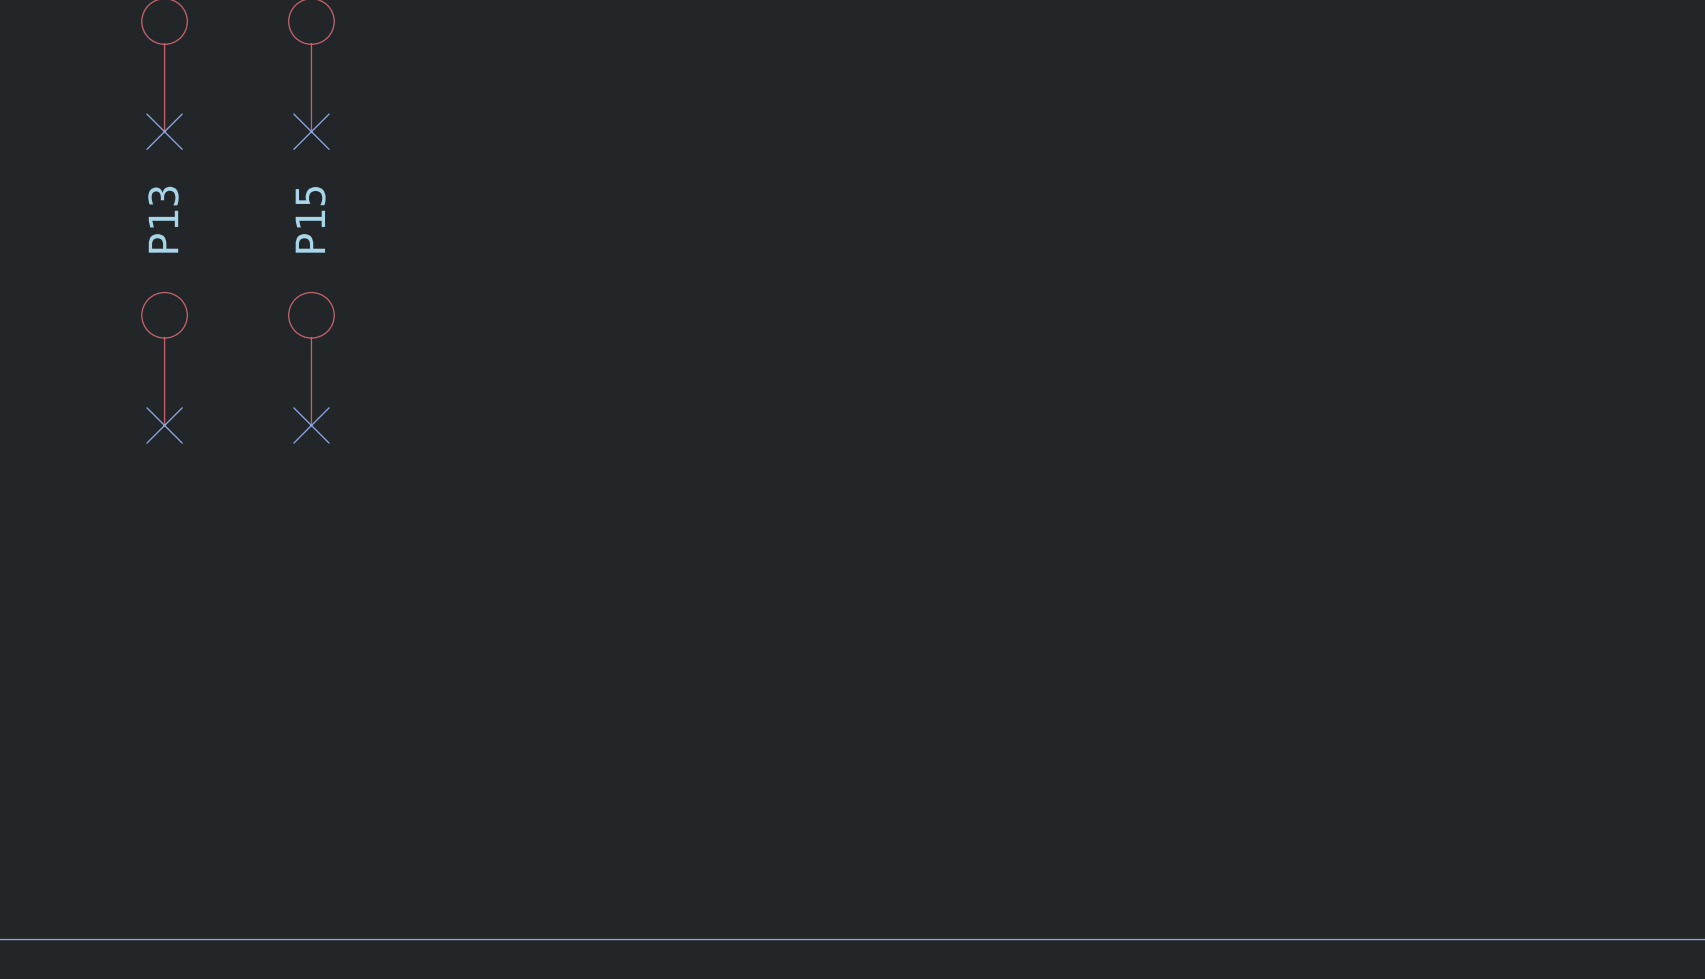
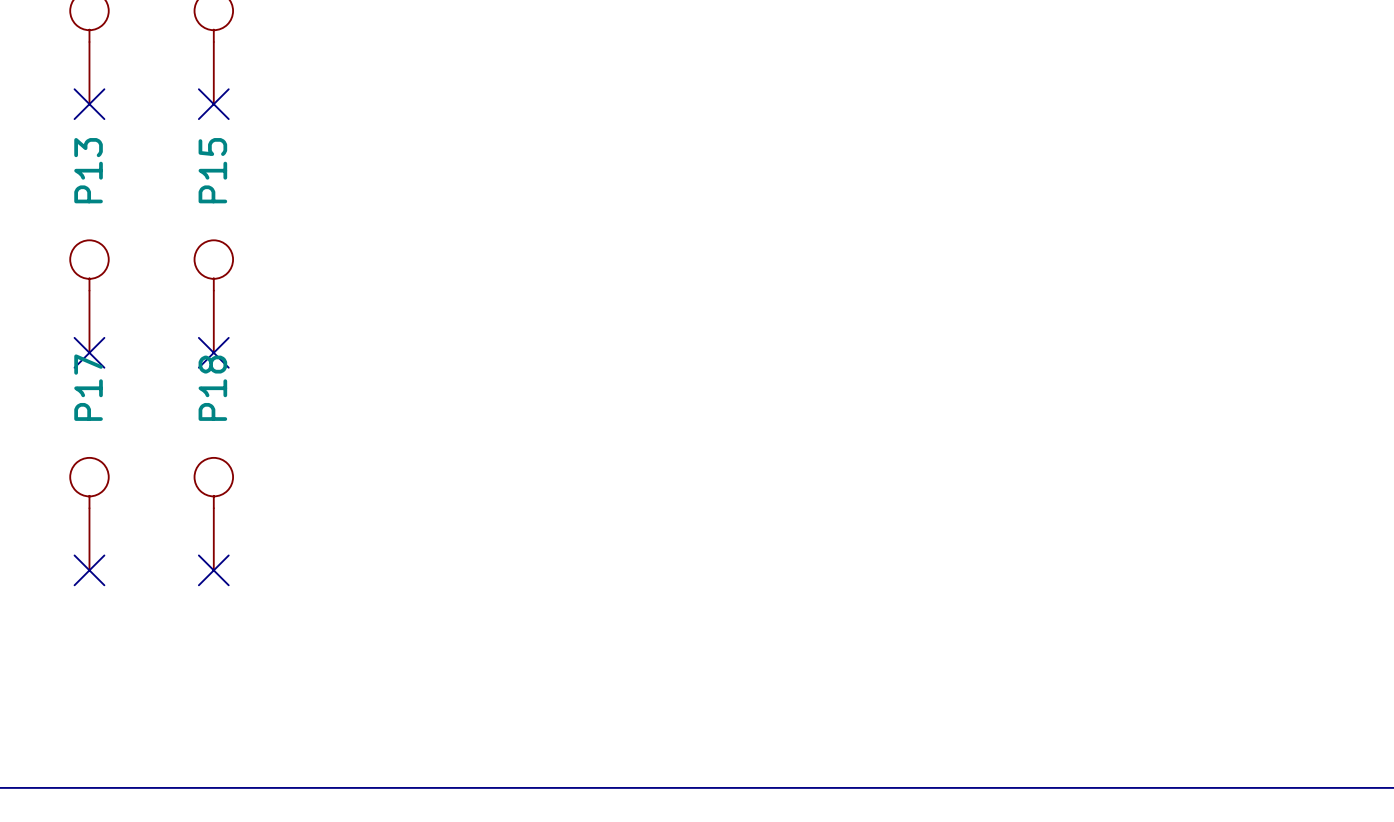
P17: none -> (89, 514)
P18: none -> (213, 514)
no-connect mark: none -> (89, 570)
no-connect mark: none -> (213, 570)

